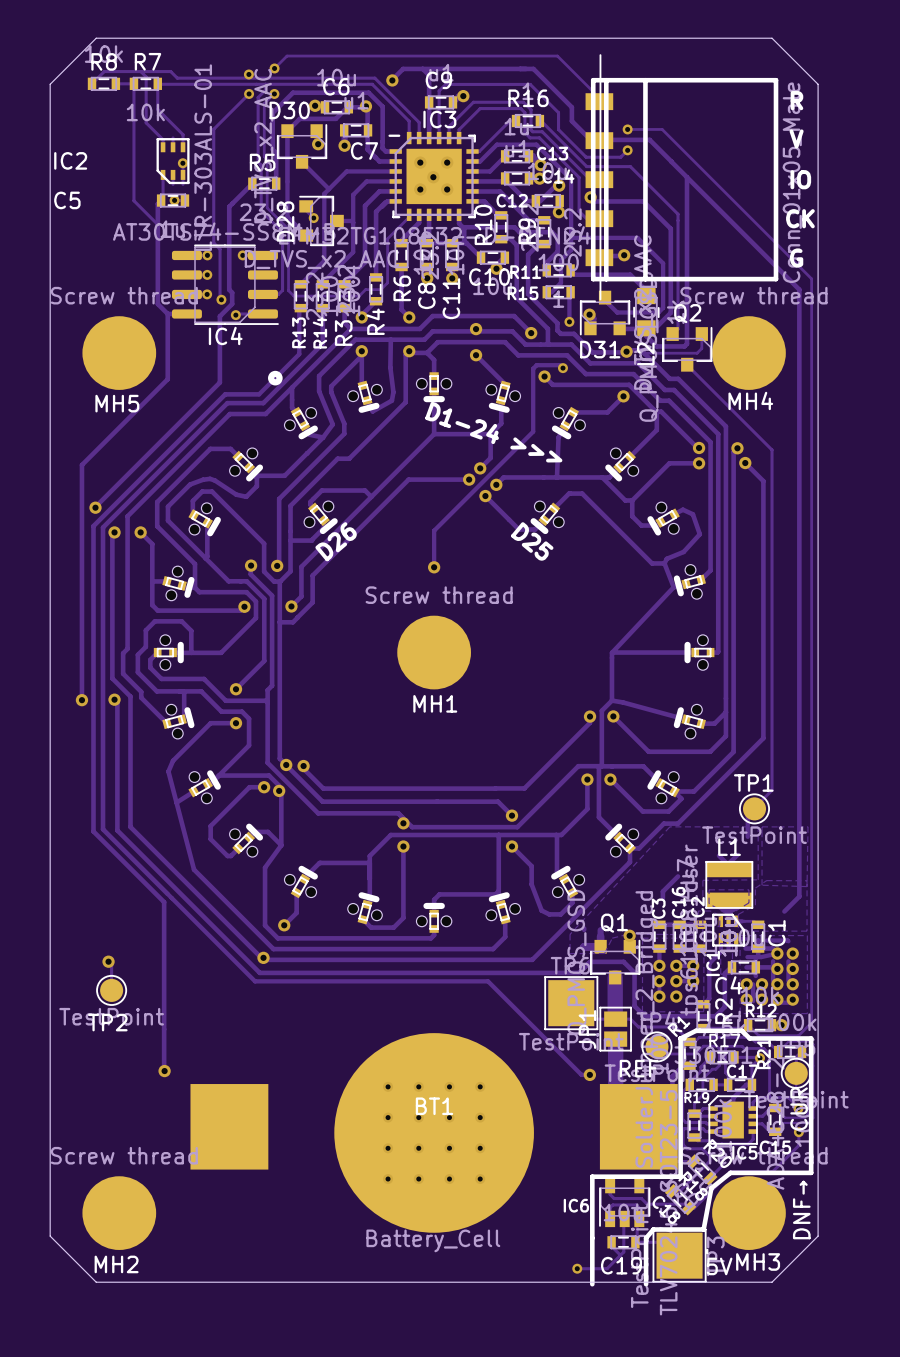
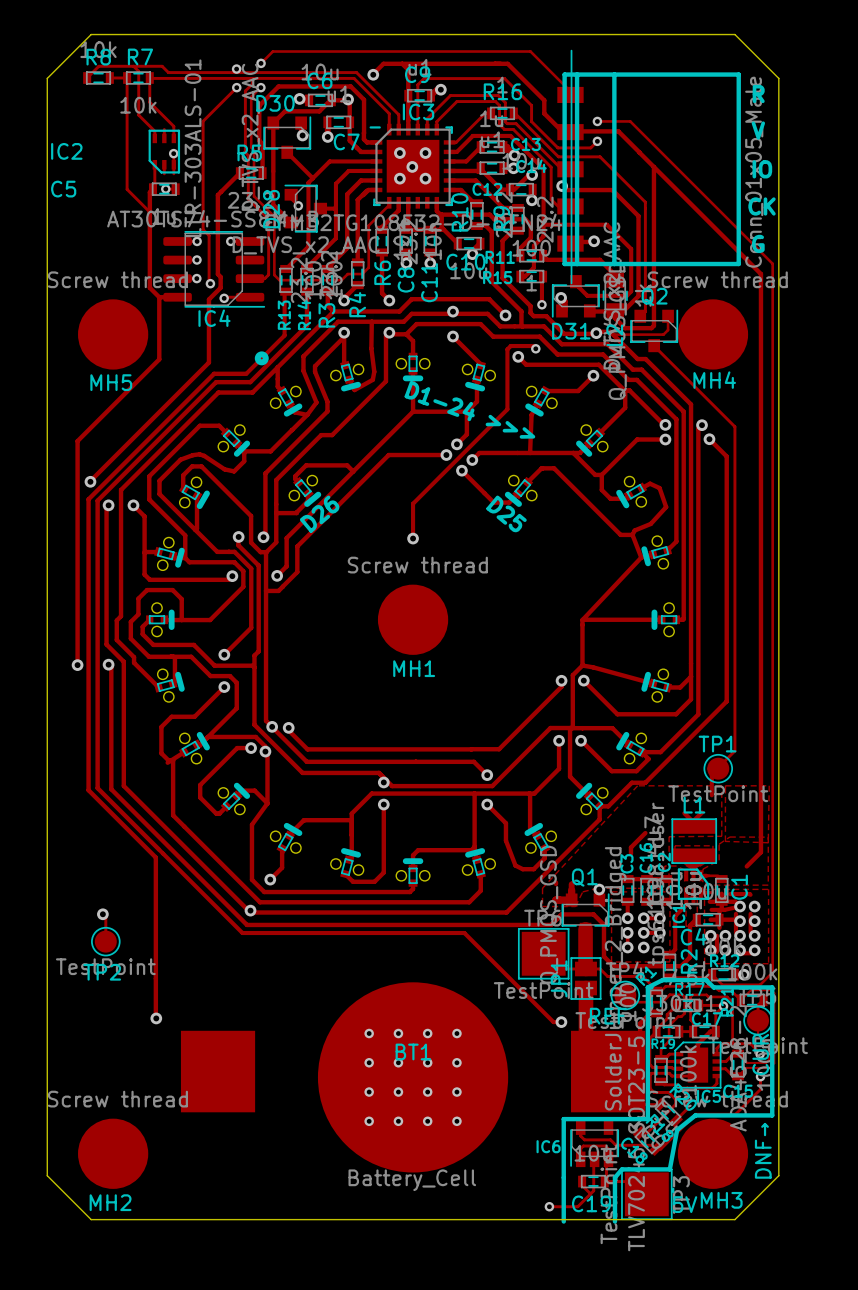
track: (236, 723) (210, 723) (173, 760) (168, 771) (194, 869) -> (224, 687) (194, 716) (171, 716) (161, 727) (161, 753) (168, 760) (173, 760) (173, 815) (184, 826)

